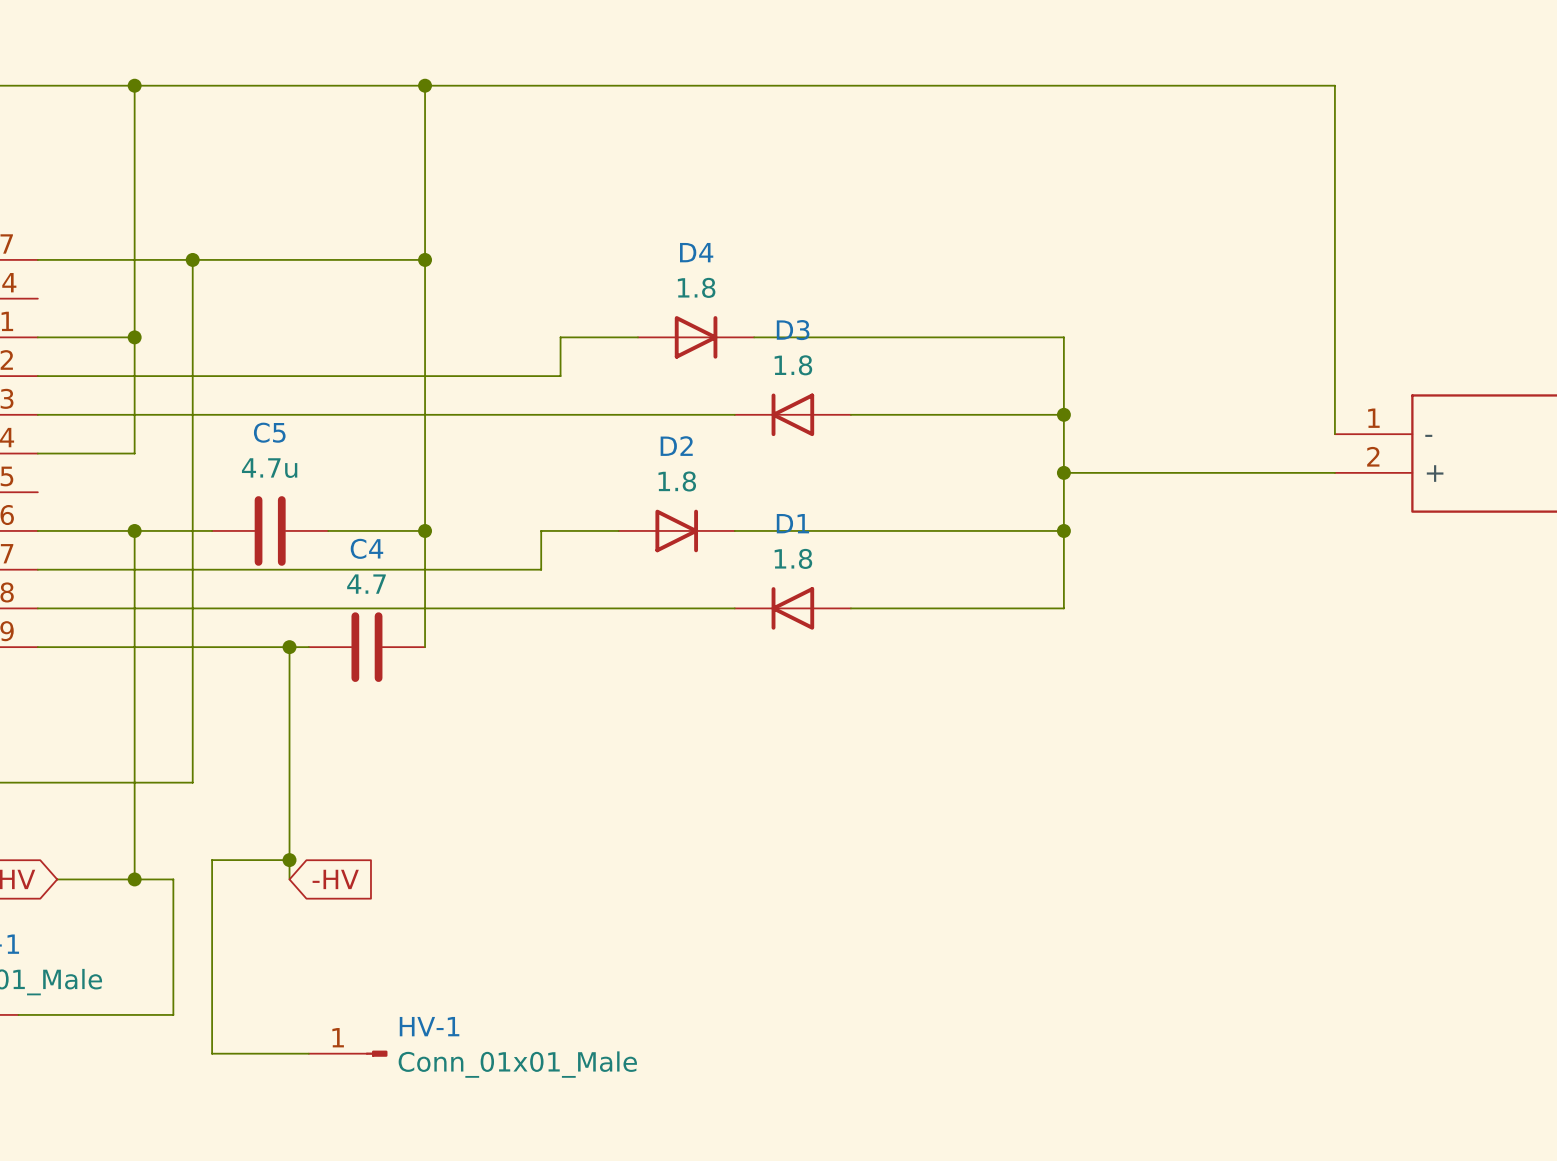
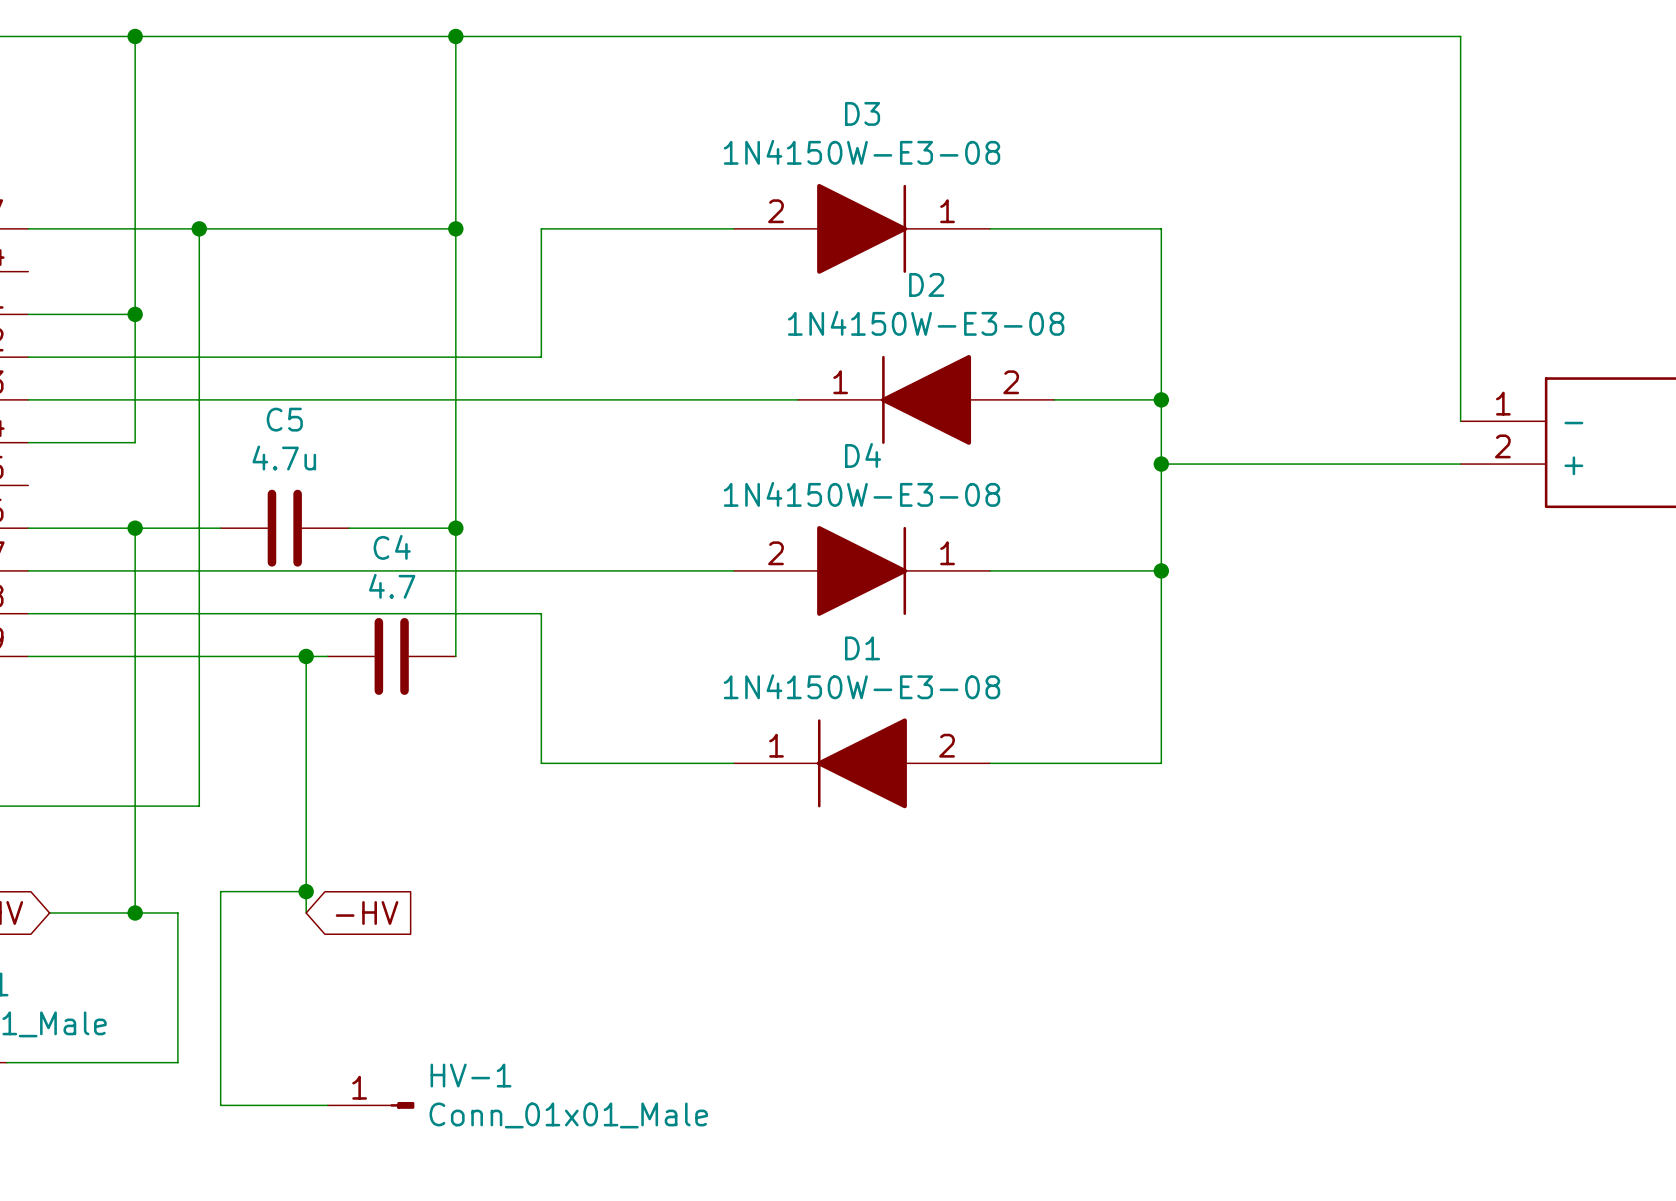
D4 value: 1.8 (696, 287) -> 1N4150W-E3-08 (862, 494)
D4 symbol: [638, 316, 755, 359] -> [733, 526, 991, 616]
wire: (638, 337) (560, 337) (560, 376) (502, 376) -> (733, 228) (541, 228) (541, 357)
wire: (754, 337) (1063, 337) -> (990, 228) (1161, 228) (1161, 314)
D3 value: 1.8 (793, 365) -> 1N4150W-E3-08 (862, 152)
D3 symbol: [734, 393, 851, 437] -> [733, 183, 991, 274]
D2 value: 1.8 (677, 481) -> 1N4150W-E3-08 (926, 323)
D2 symbol: [618, 509, 735, 553] -> [797, 355, 1055, 445]
wire: (618, 530) (541, 530) (541, 569) -> (733, 570) (584, 570)
wire: (734, 530) (1063, 530) -> none
junction position: (1063, 530) -> (1161, 570)
D1 value: 1.8 (793, 558) -> 1N4150W-E3-08 (862, 686)
wire: none -> (990, 570) (1161, 570)
D1 symbol: [734, 587, 851, 630] -> [733, 718, 991, 809]
wire: (502, 608) (734, 608) -> (541, 613) (541, 763) (733, 763)
wire: (850, 608) (1063, 608) -> (990, 763) (1161, 763) (1161, 613)

